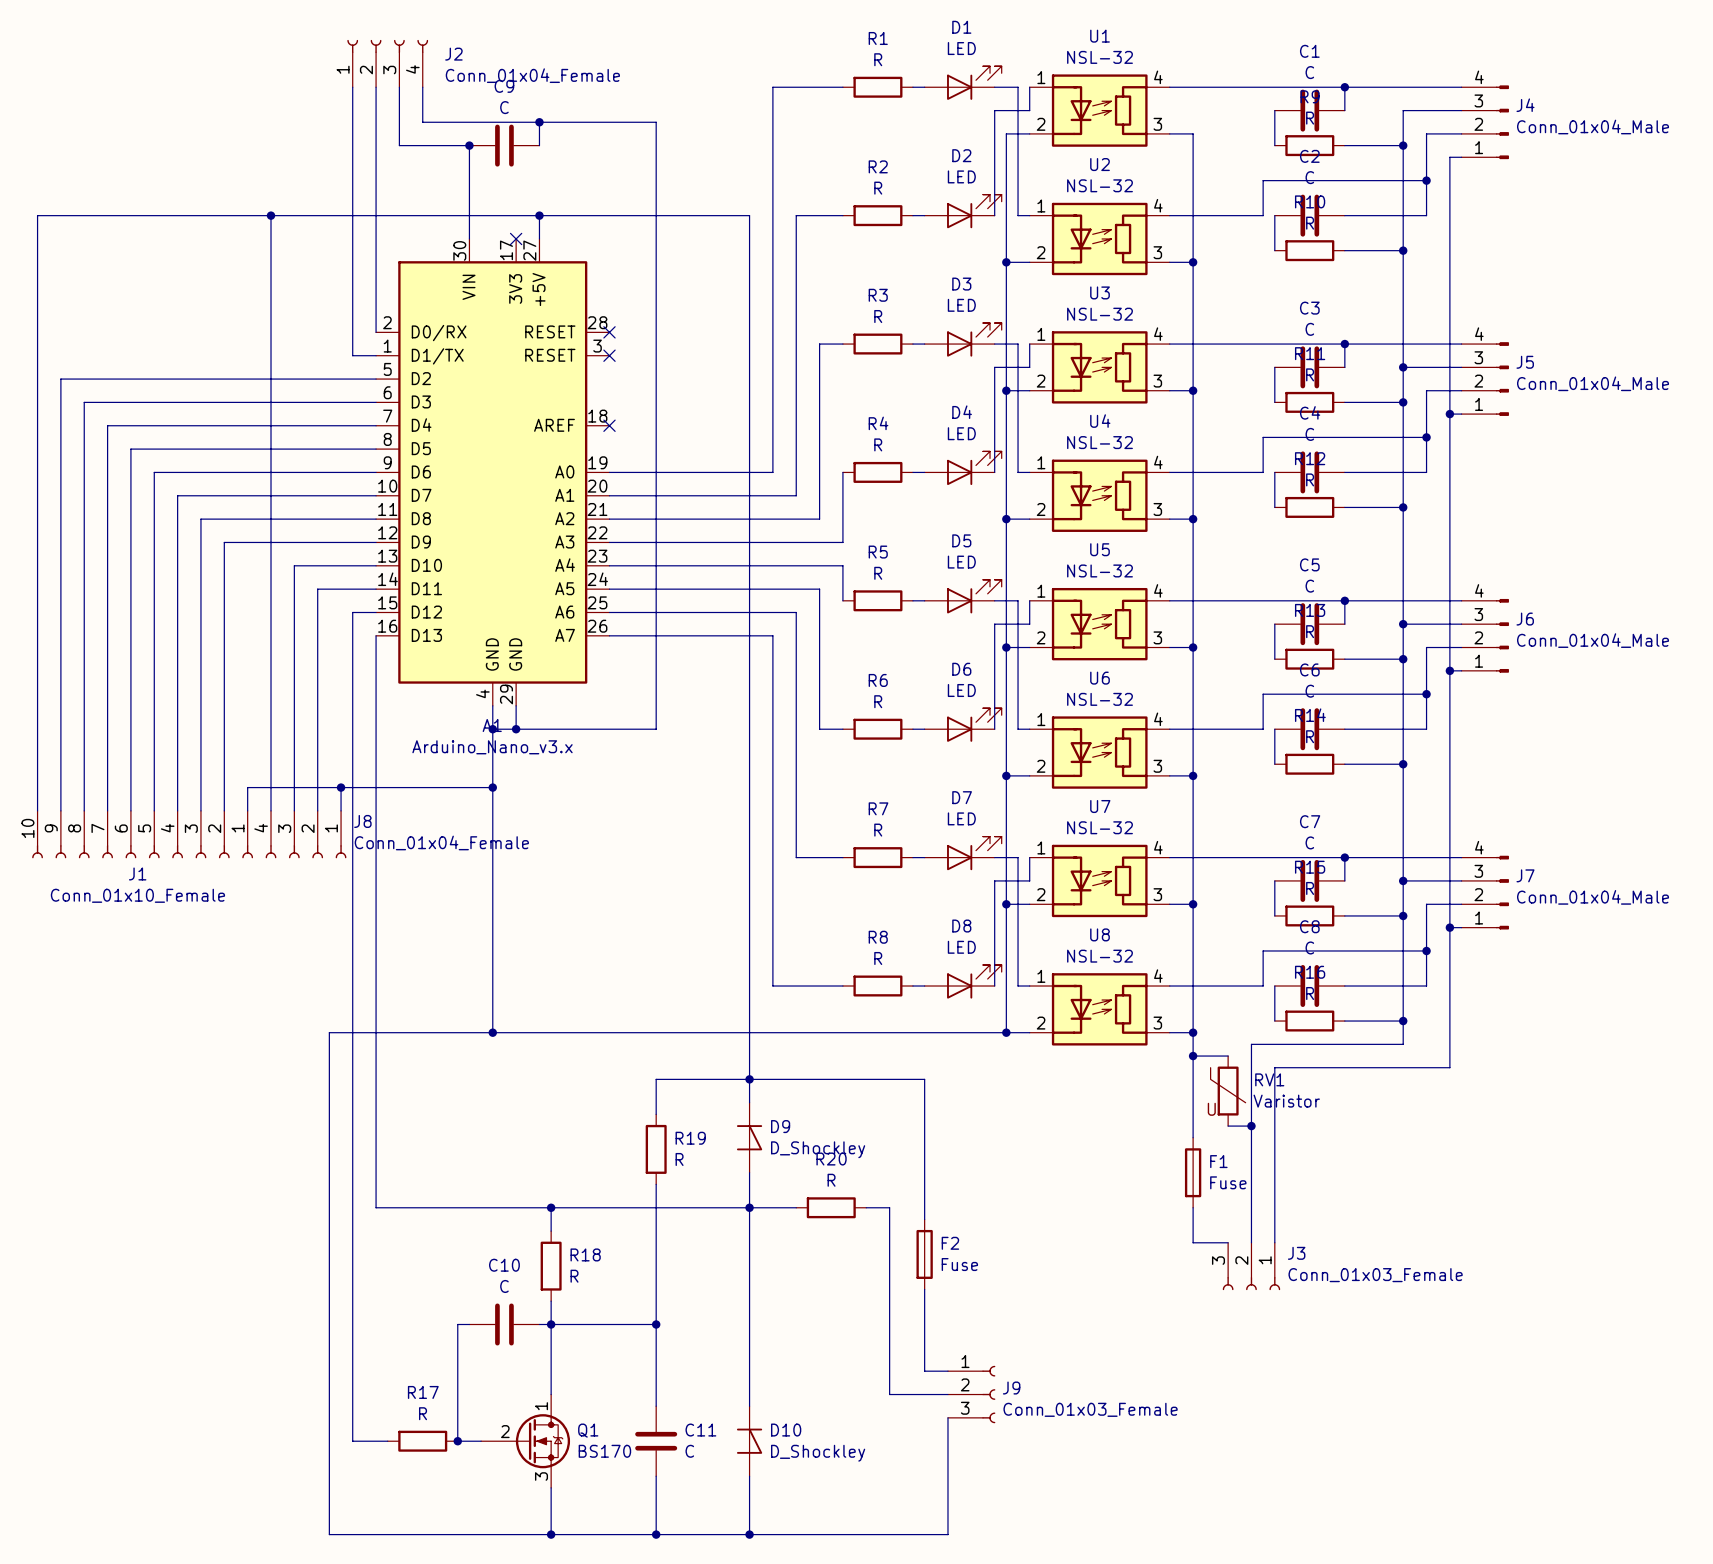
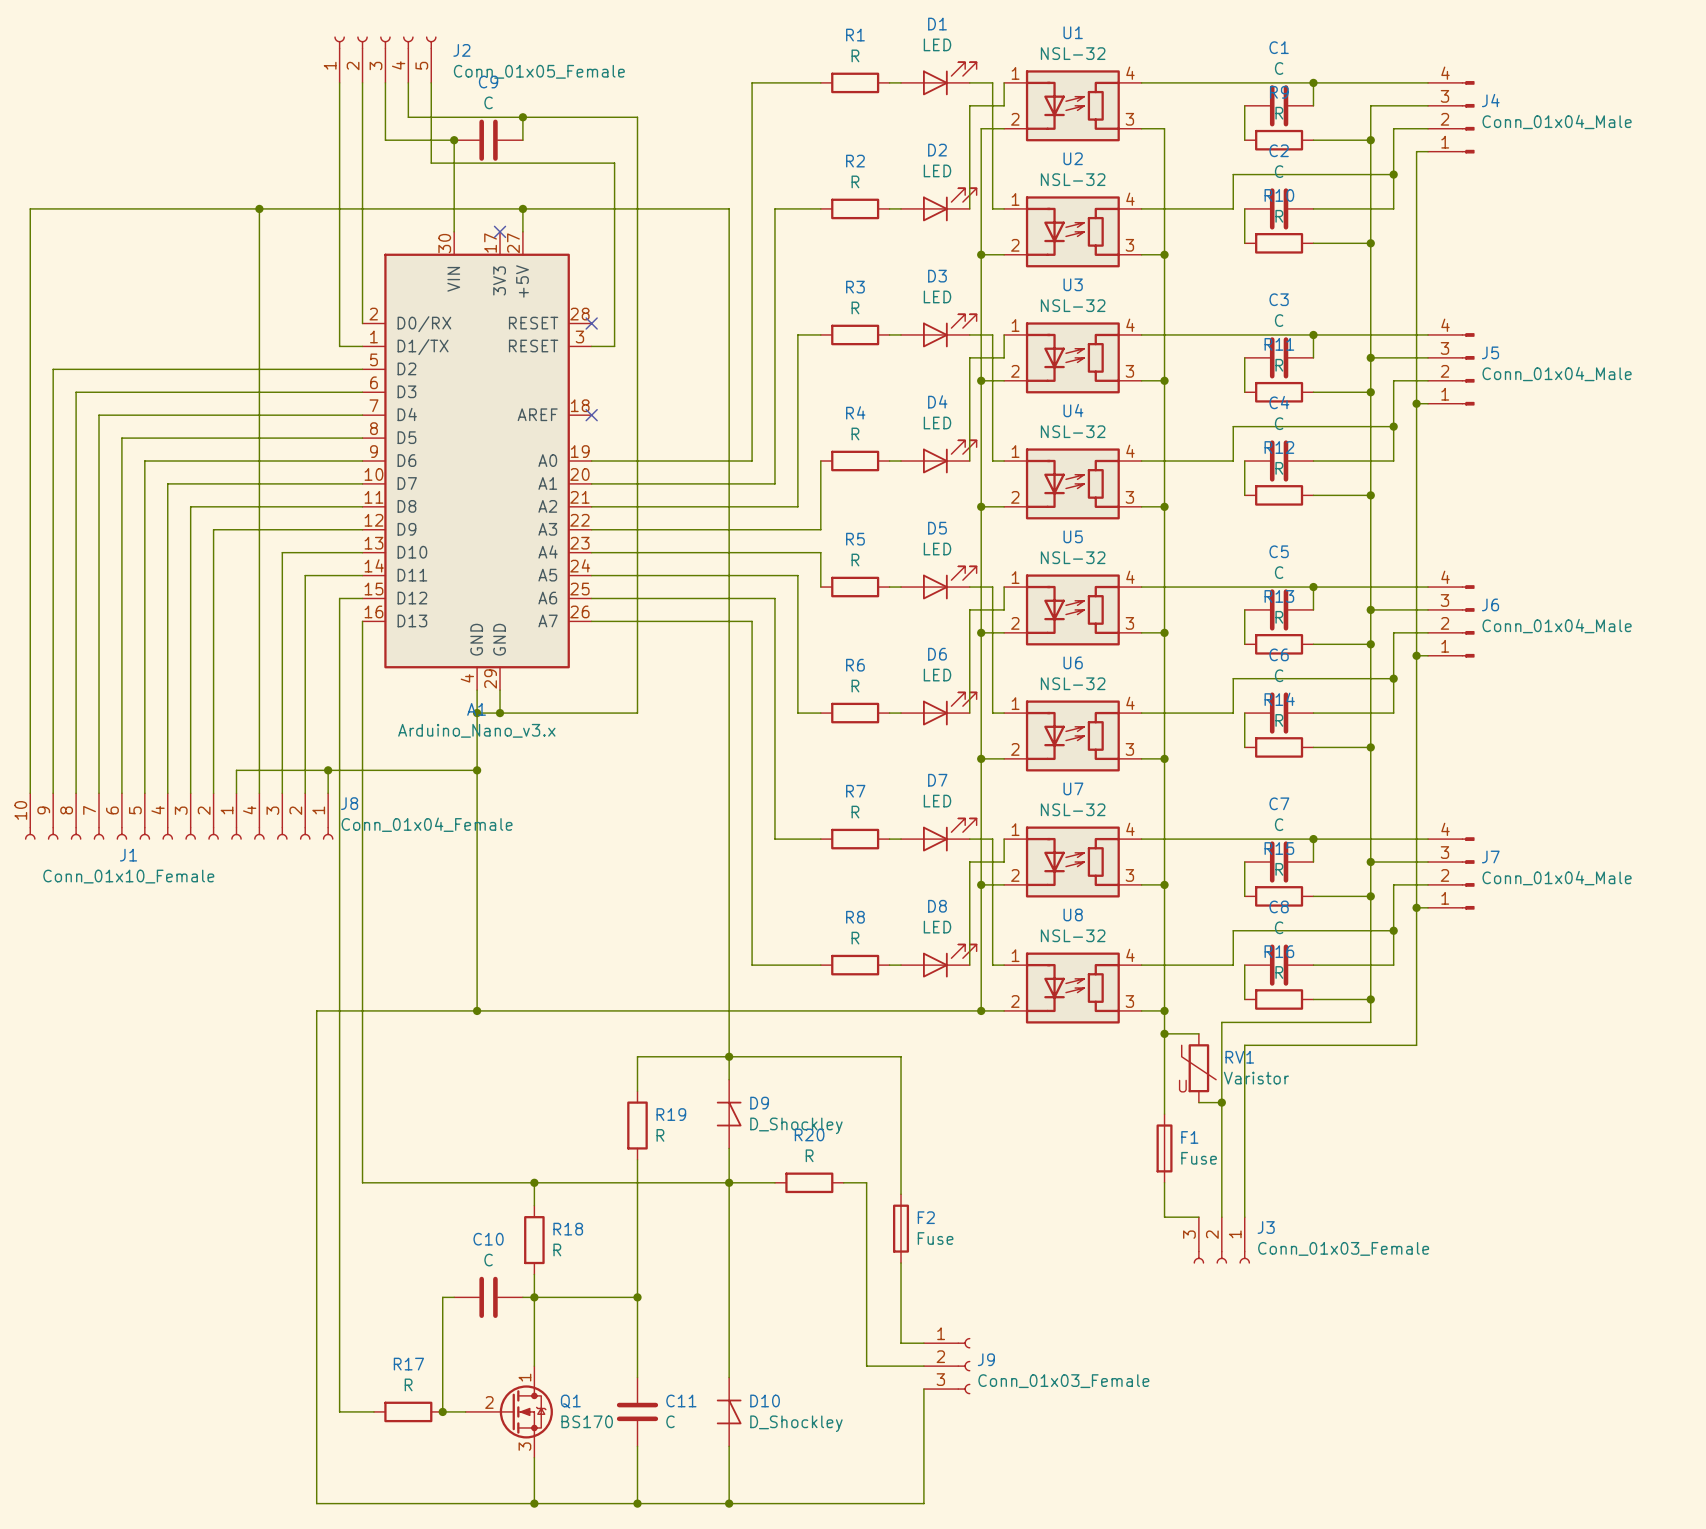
J2 symbol: [347, 39, 429, 88] -> [334, 36, 437, 83]
J2 value: Conn_01x04_Female (532, 75) -> Conn_01x05_Female (539, 71)
wire: none -> (431, 82) (431, 163) (614, 163) (614, 346) (591, 346)
no-connect mark: (609, 355) -> none

